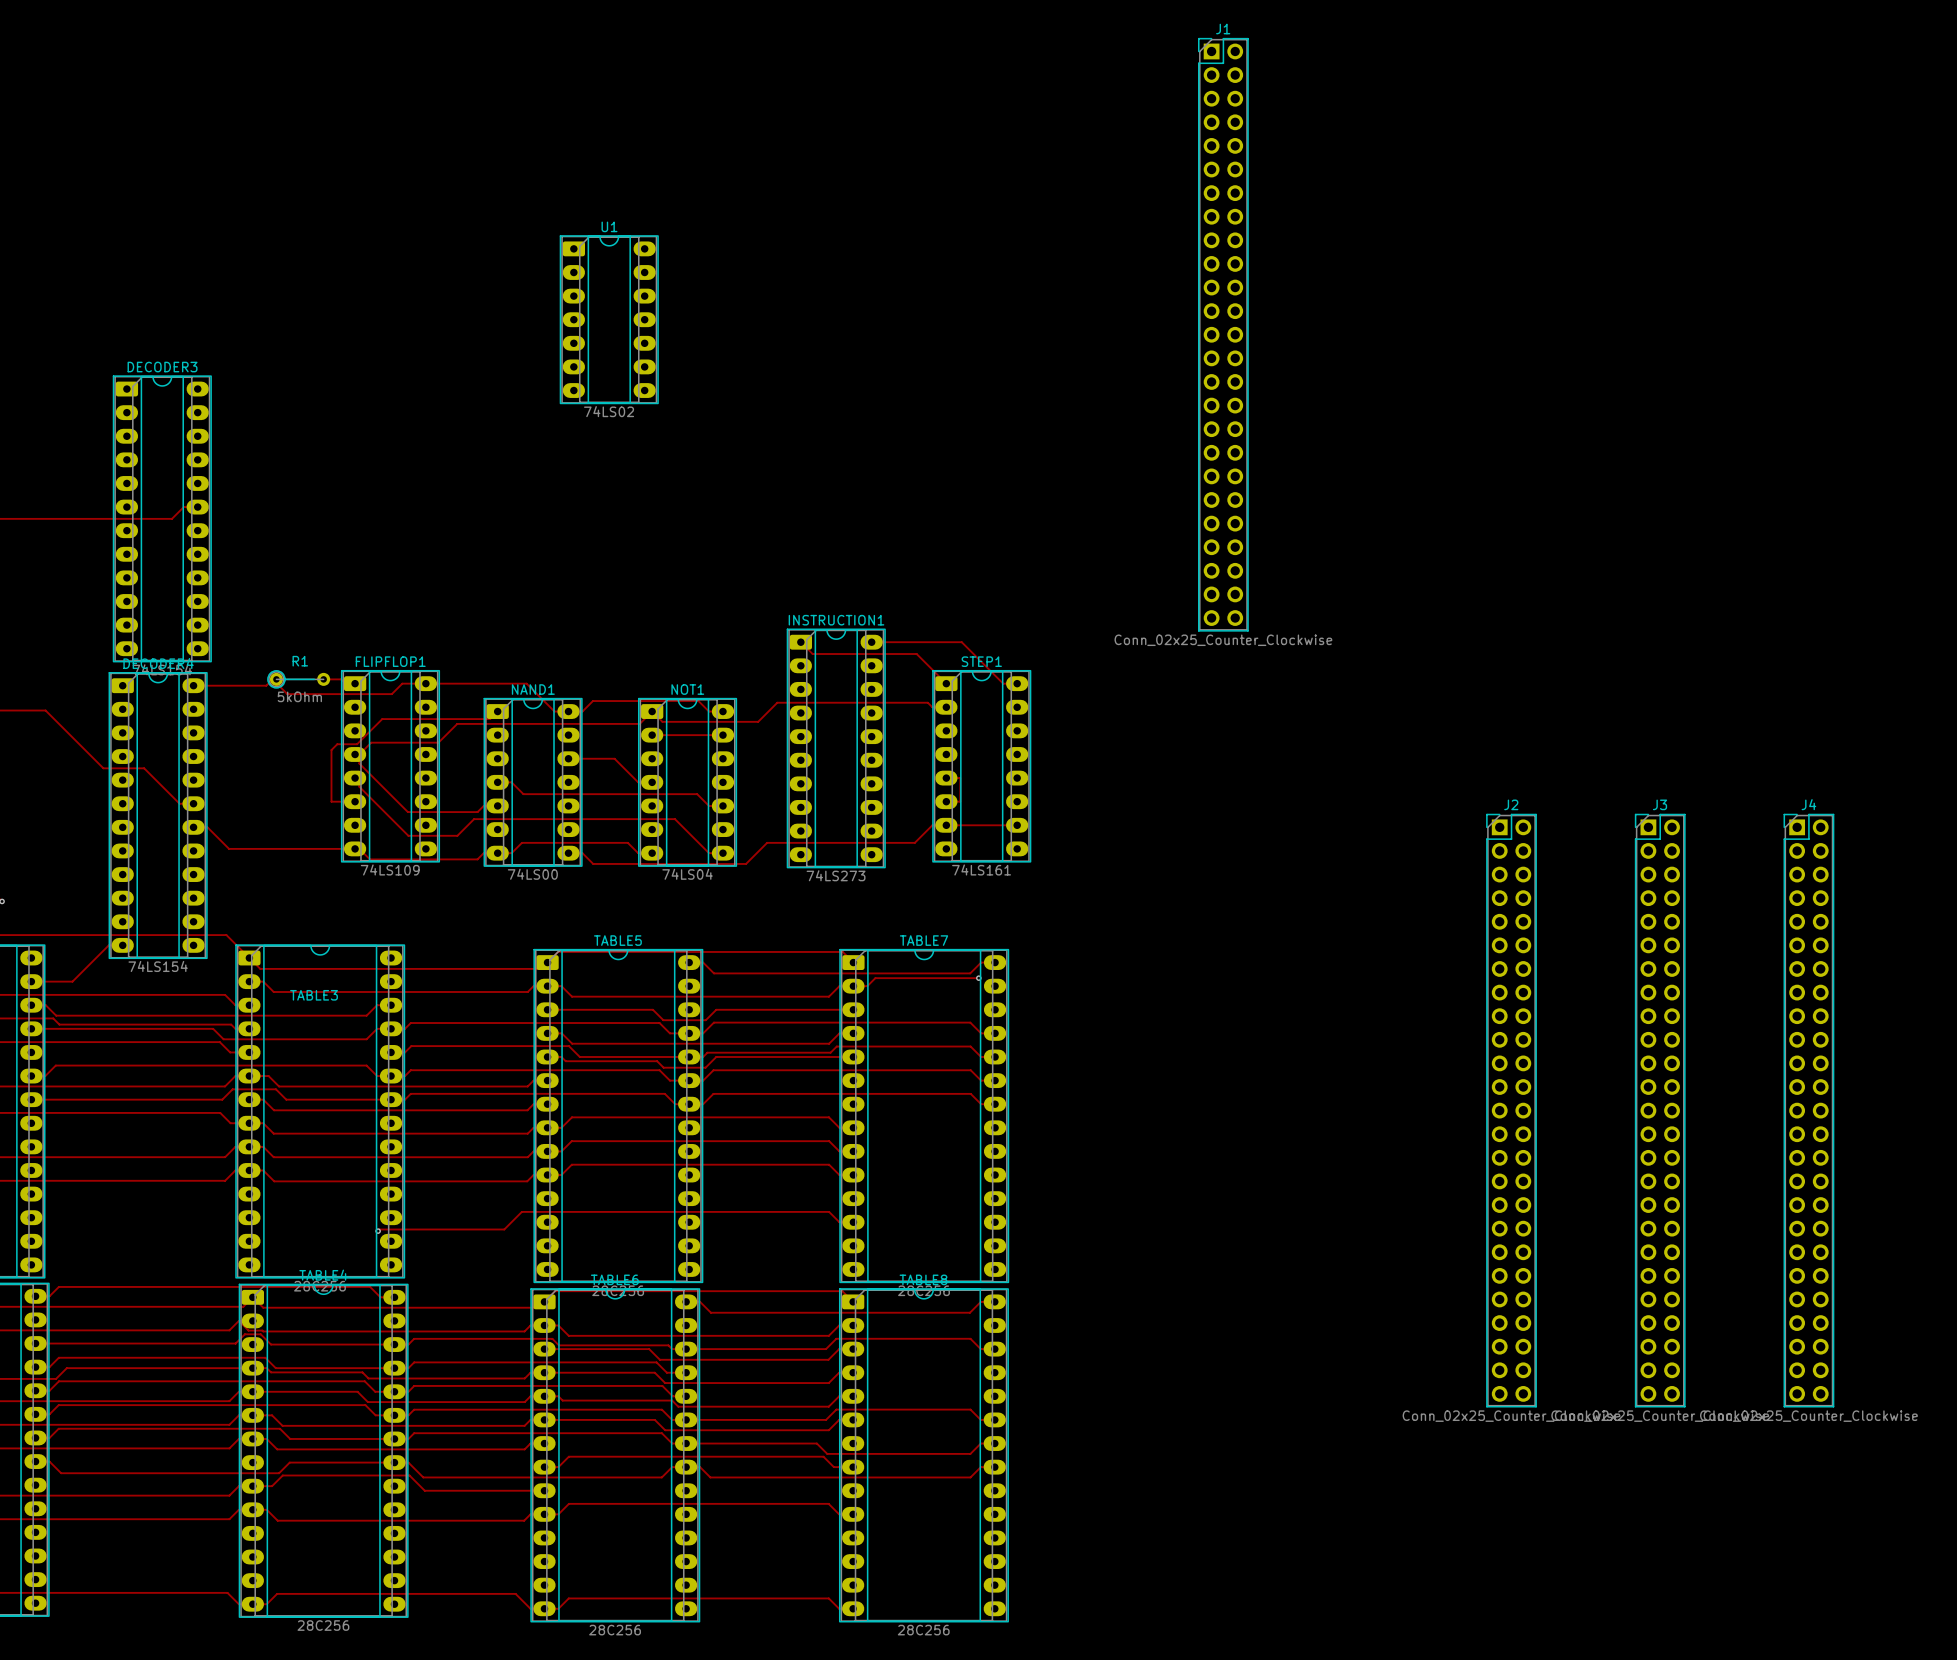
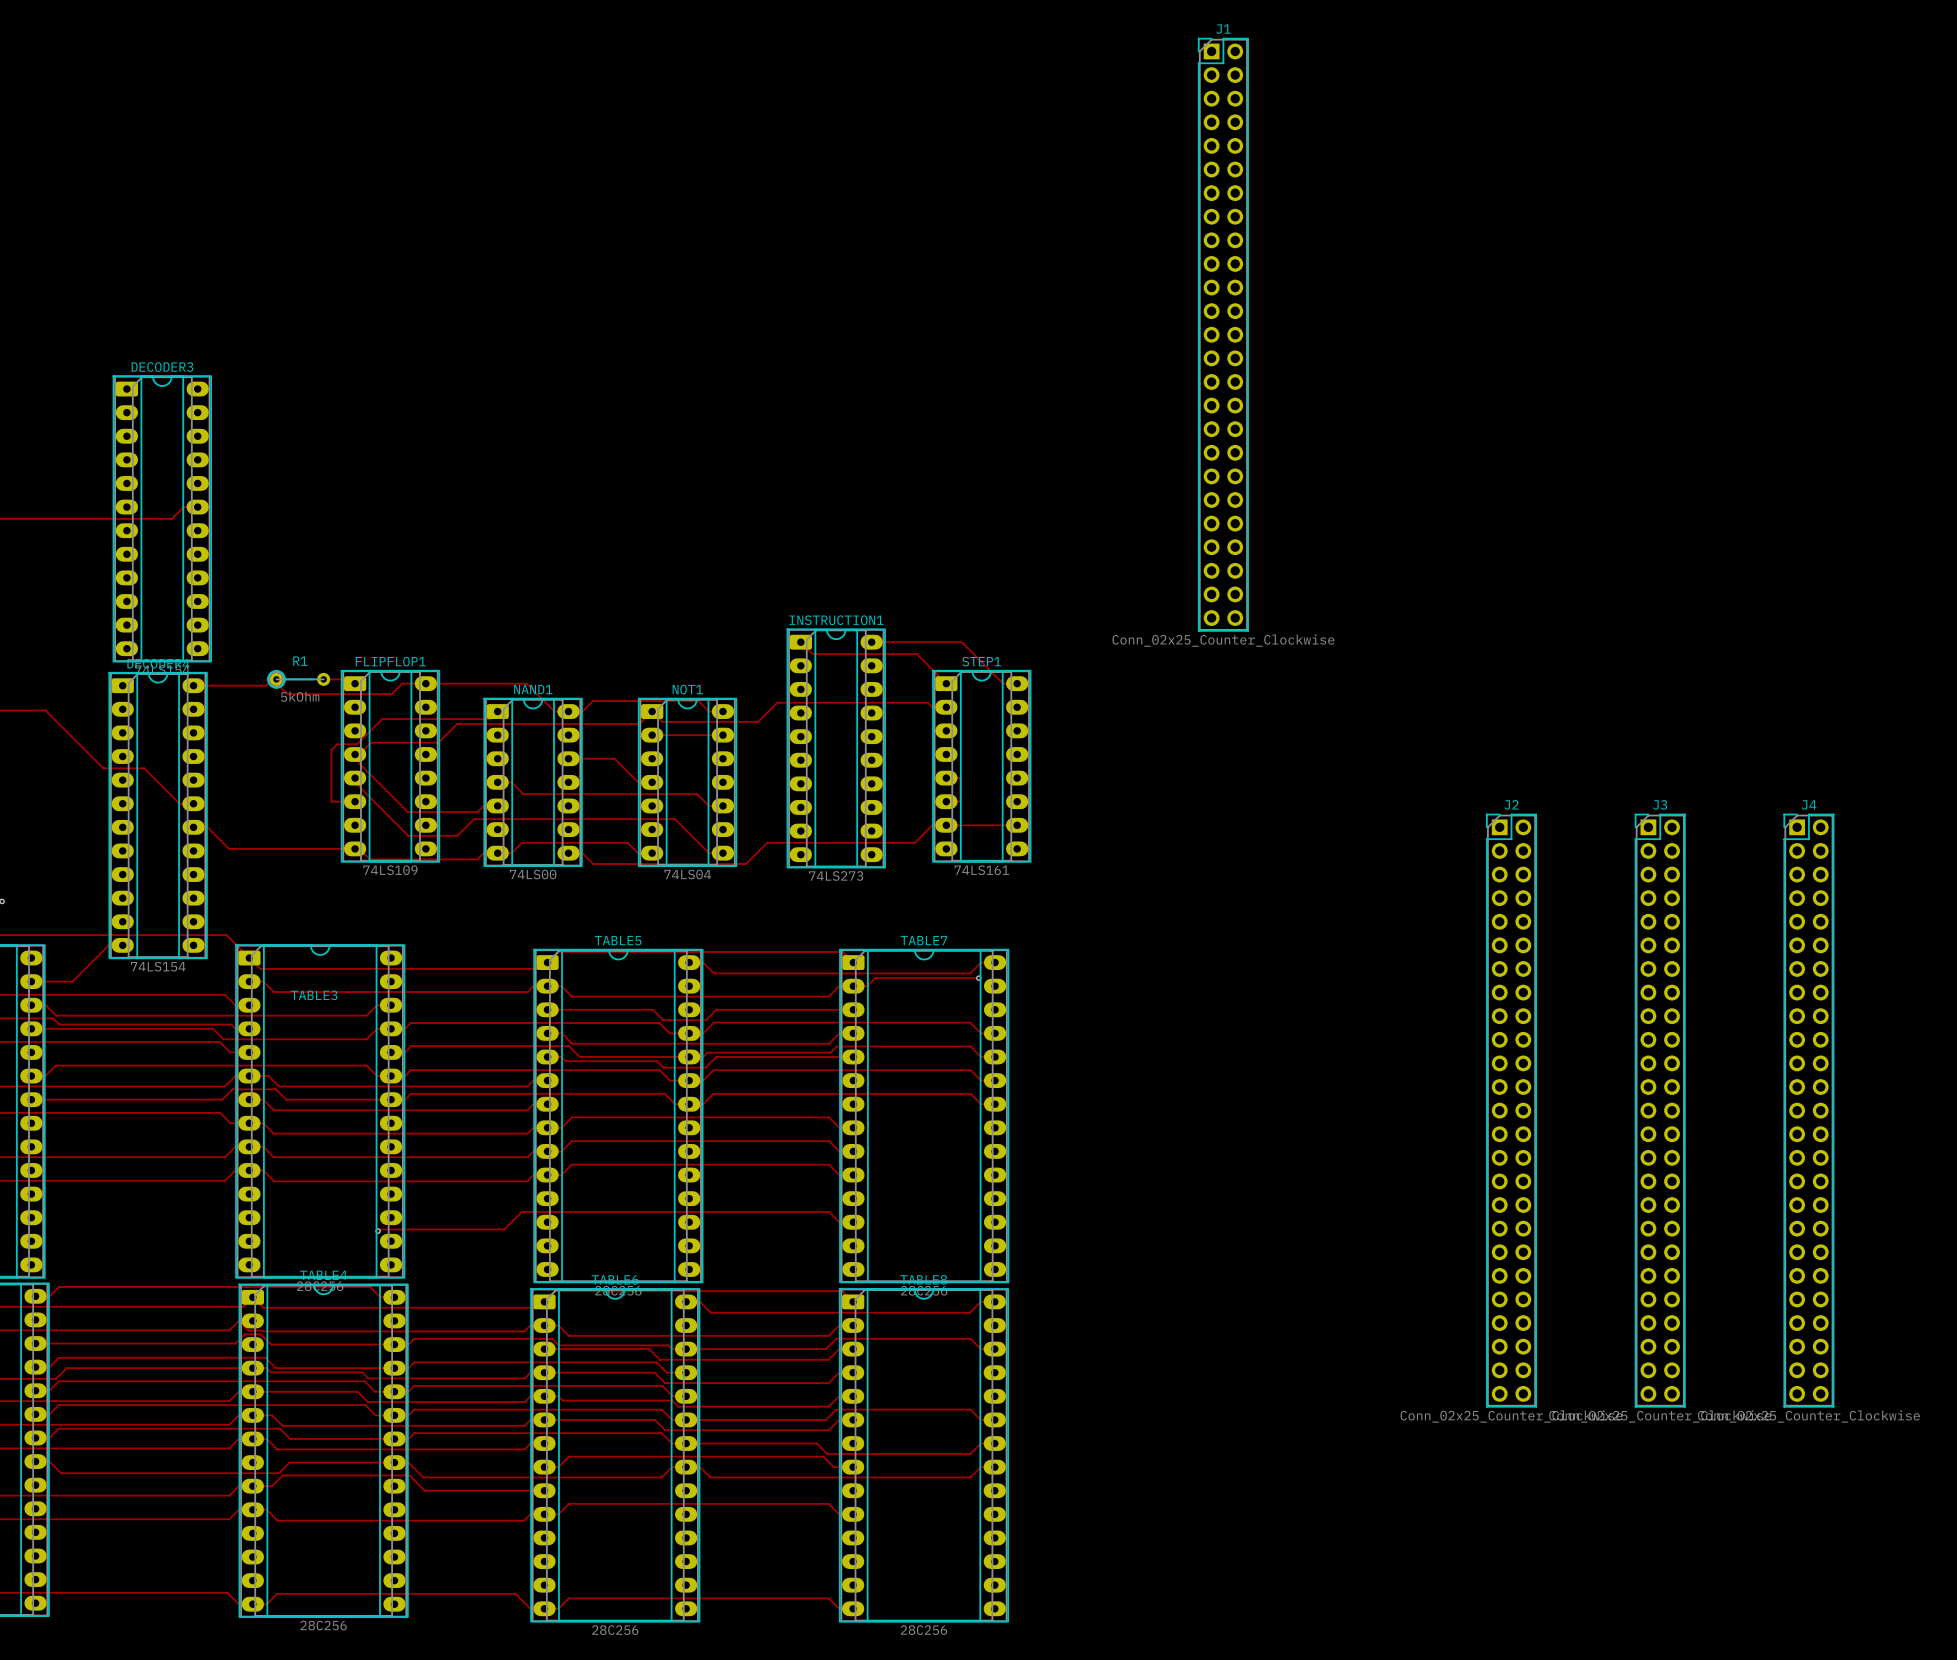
U1: 74LS02 (609, 319) -> none

